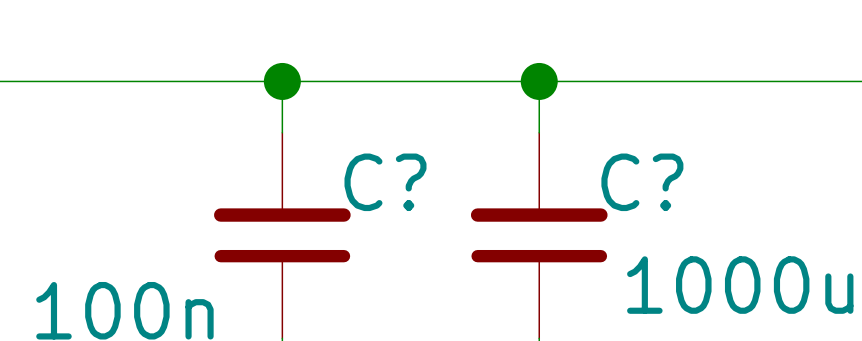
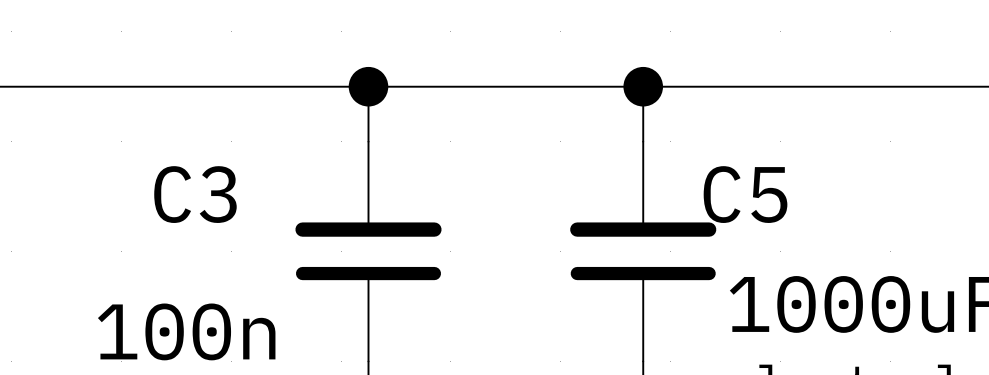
C? name: C? (385, 182) -> C3 (195, 194)
C? name: C? (642, 182) -> C5 (745, 194)

